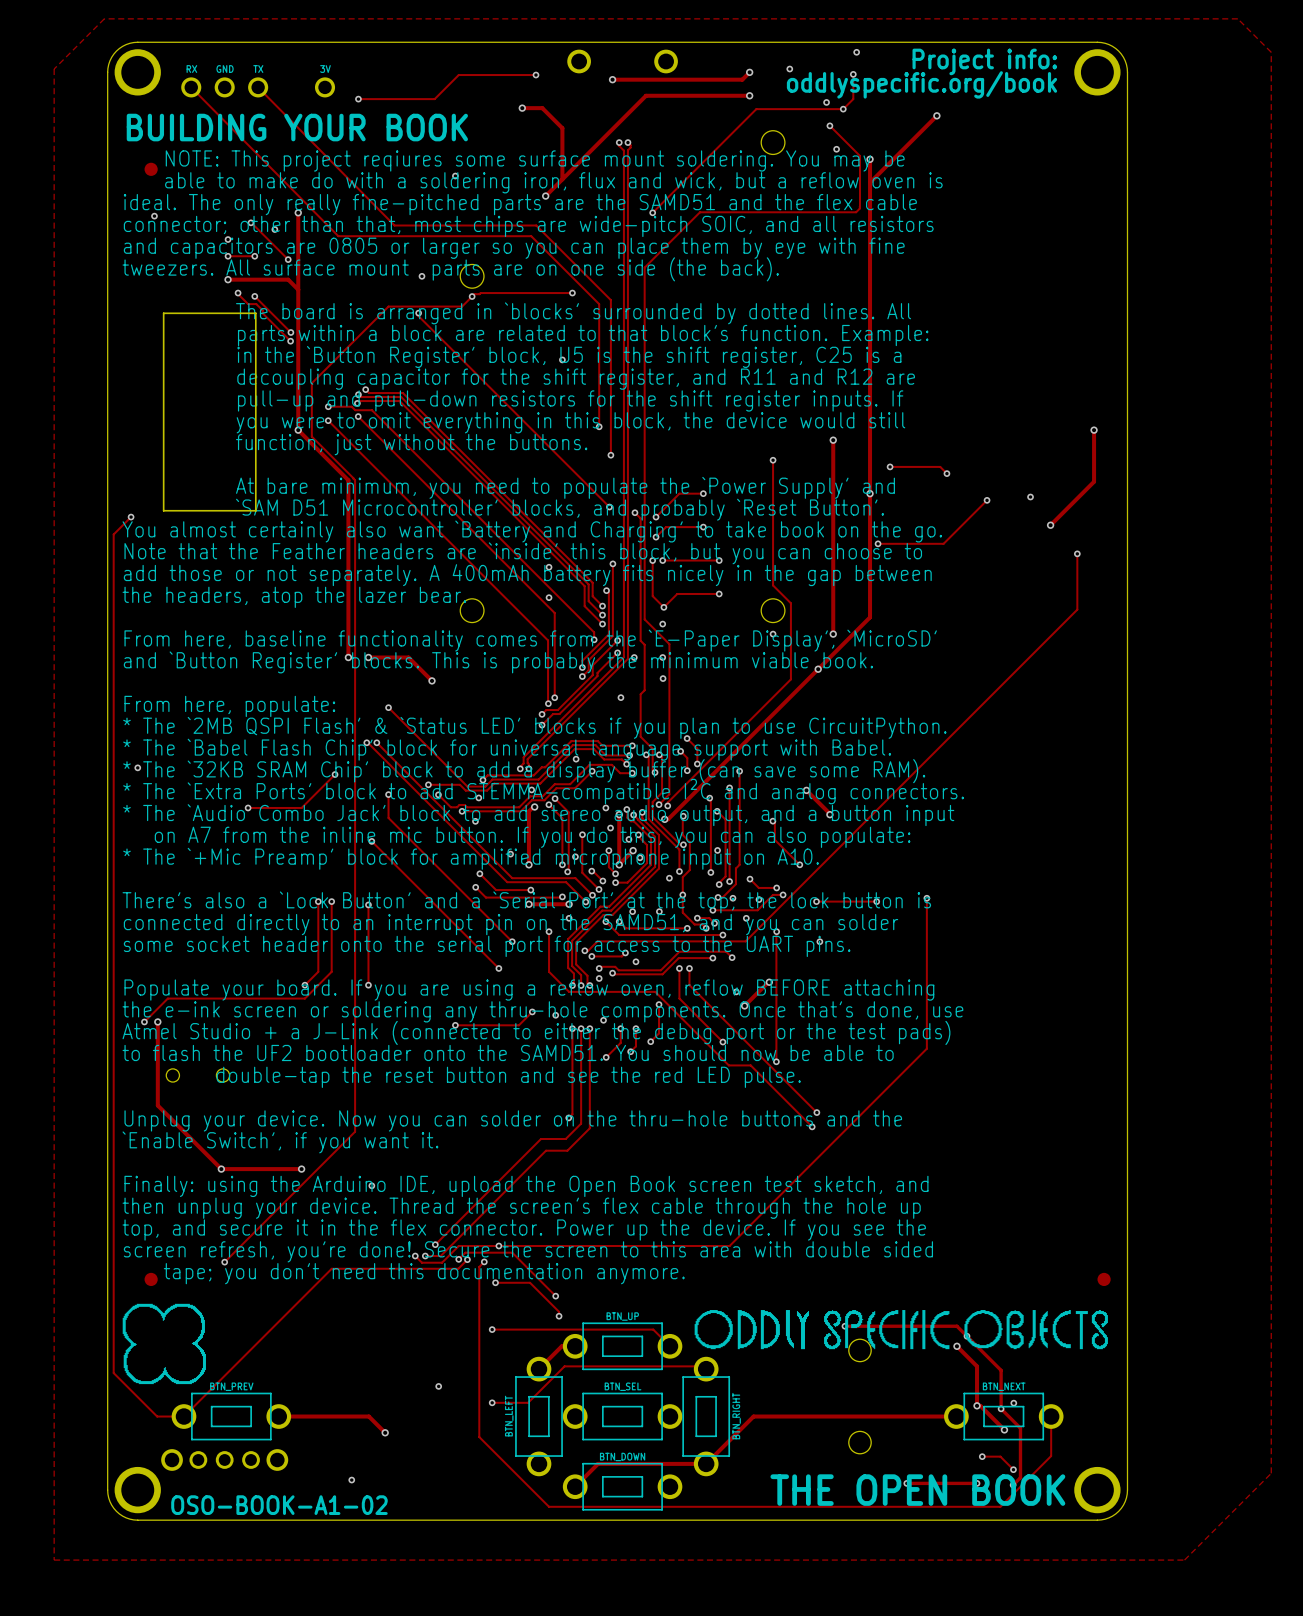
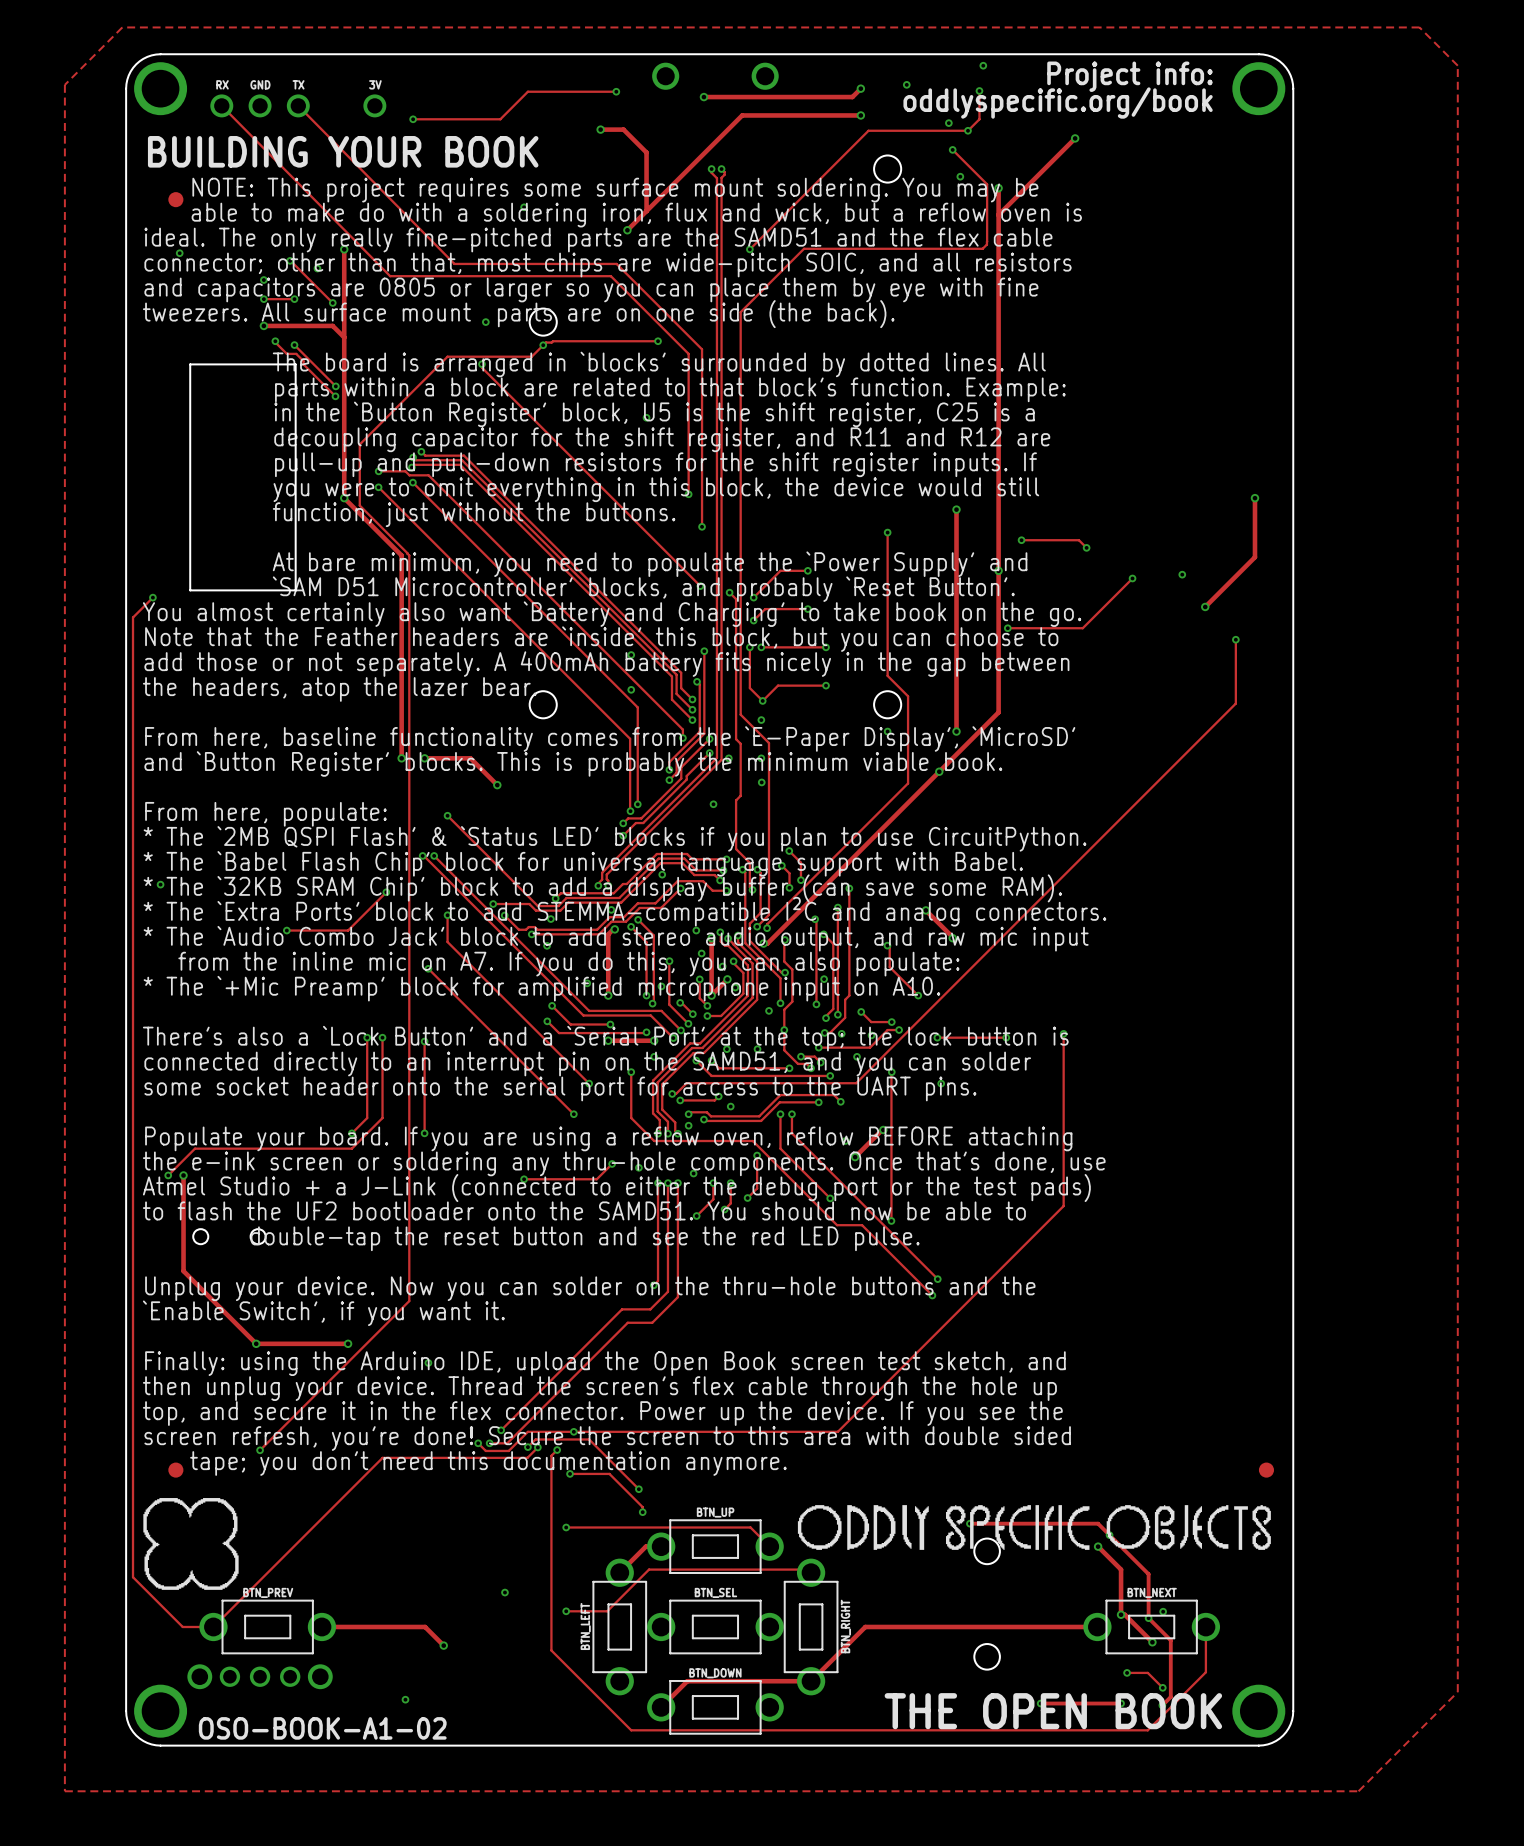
text: NOTE: This project reqiures some surface mount soldering. You may be (535, 160) -> NOTE: This project requires some surface mount soldering. You may be (615, 190)
text: * The `Audio Combo Jack' block to add stereo audio output, and a button input (538, 815) -> * The `Audio Combo Jack' block to add stereo audio output, and raw mic input (616, 938)
text: on A7 from the inline mic button. If you do this, you can also populate: (532, 837) -> from the inline mic on A7. If you do this, you can also populate: (568, 964)

